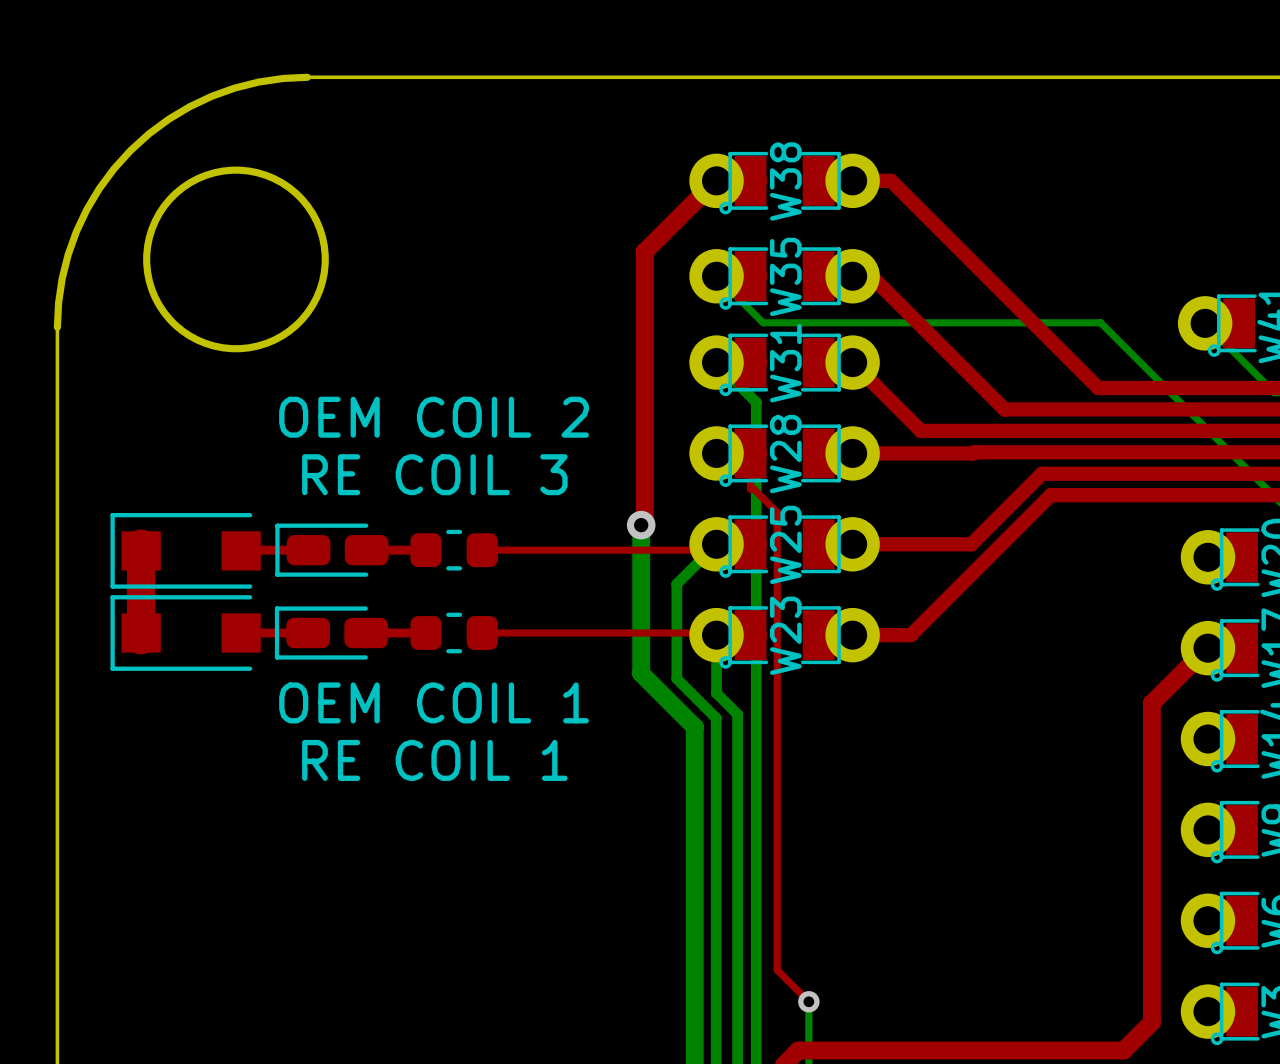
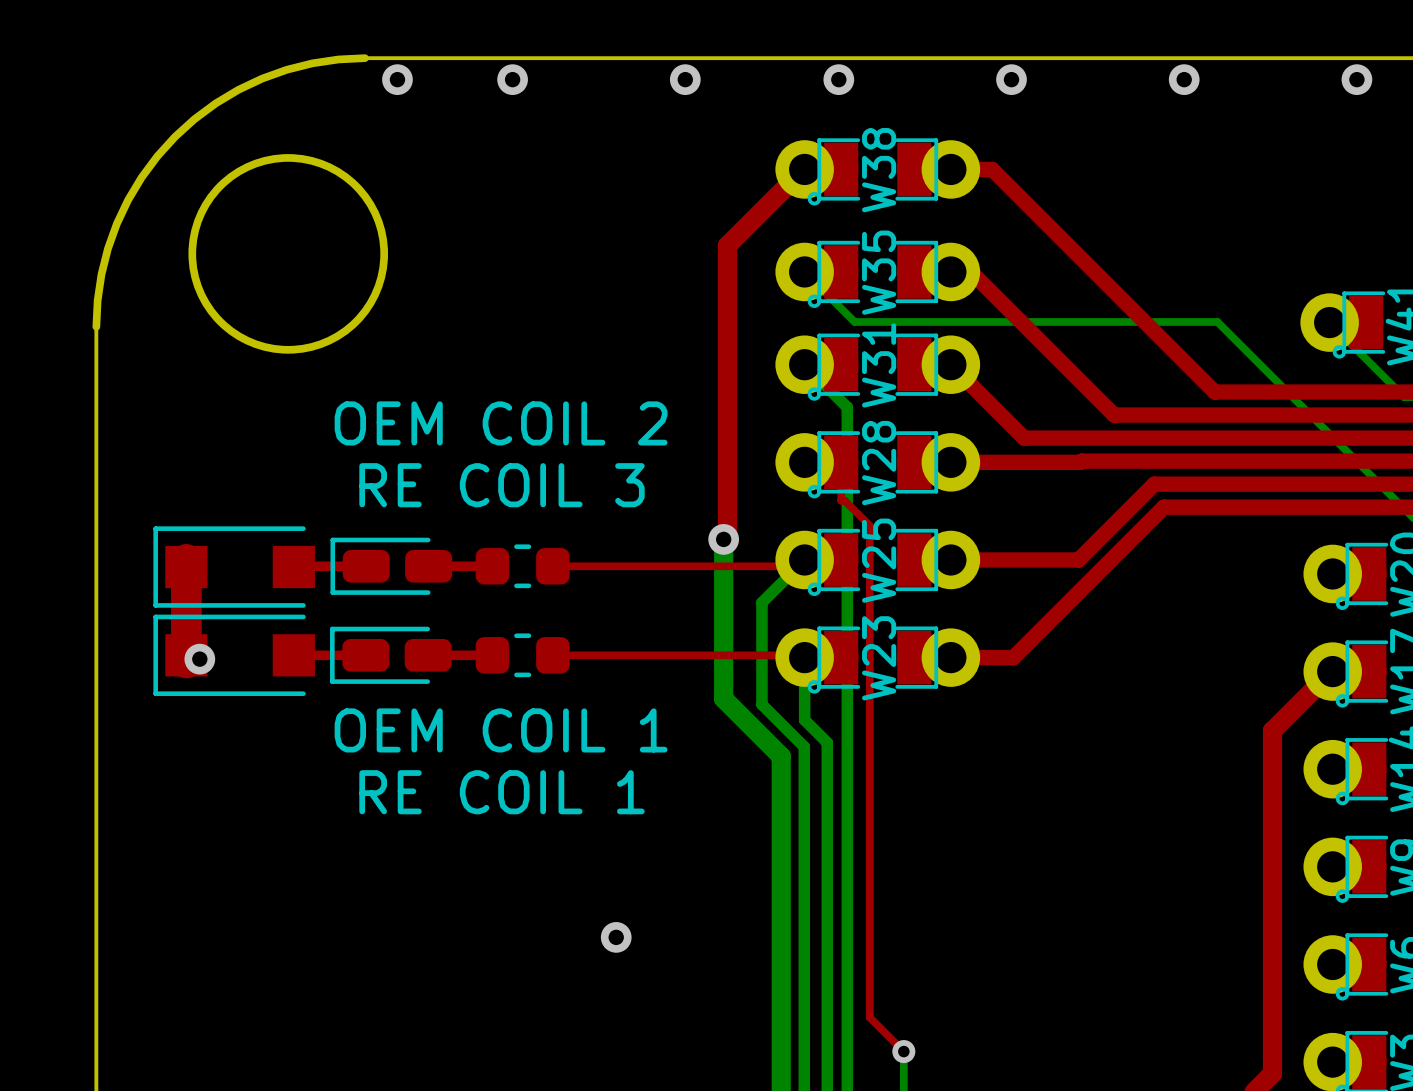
via: none -> (397, 79)
via: none -> (512, 79)
via: none -> (685, 79)
via: none -> (838, 79)
via: none -> (1011, 79)
via: none -> (1184, 79)
via: none -> (1356, 79)
via: none -> (199, 659)
via: none -> (616, 937)

